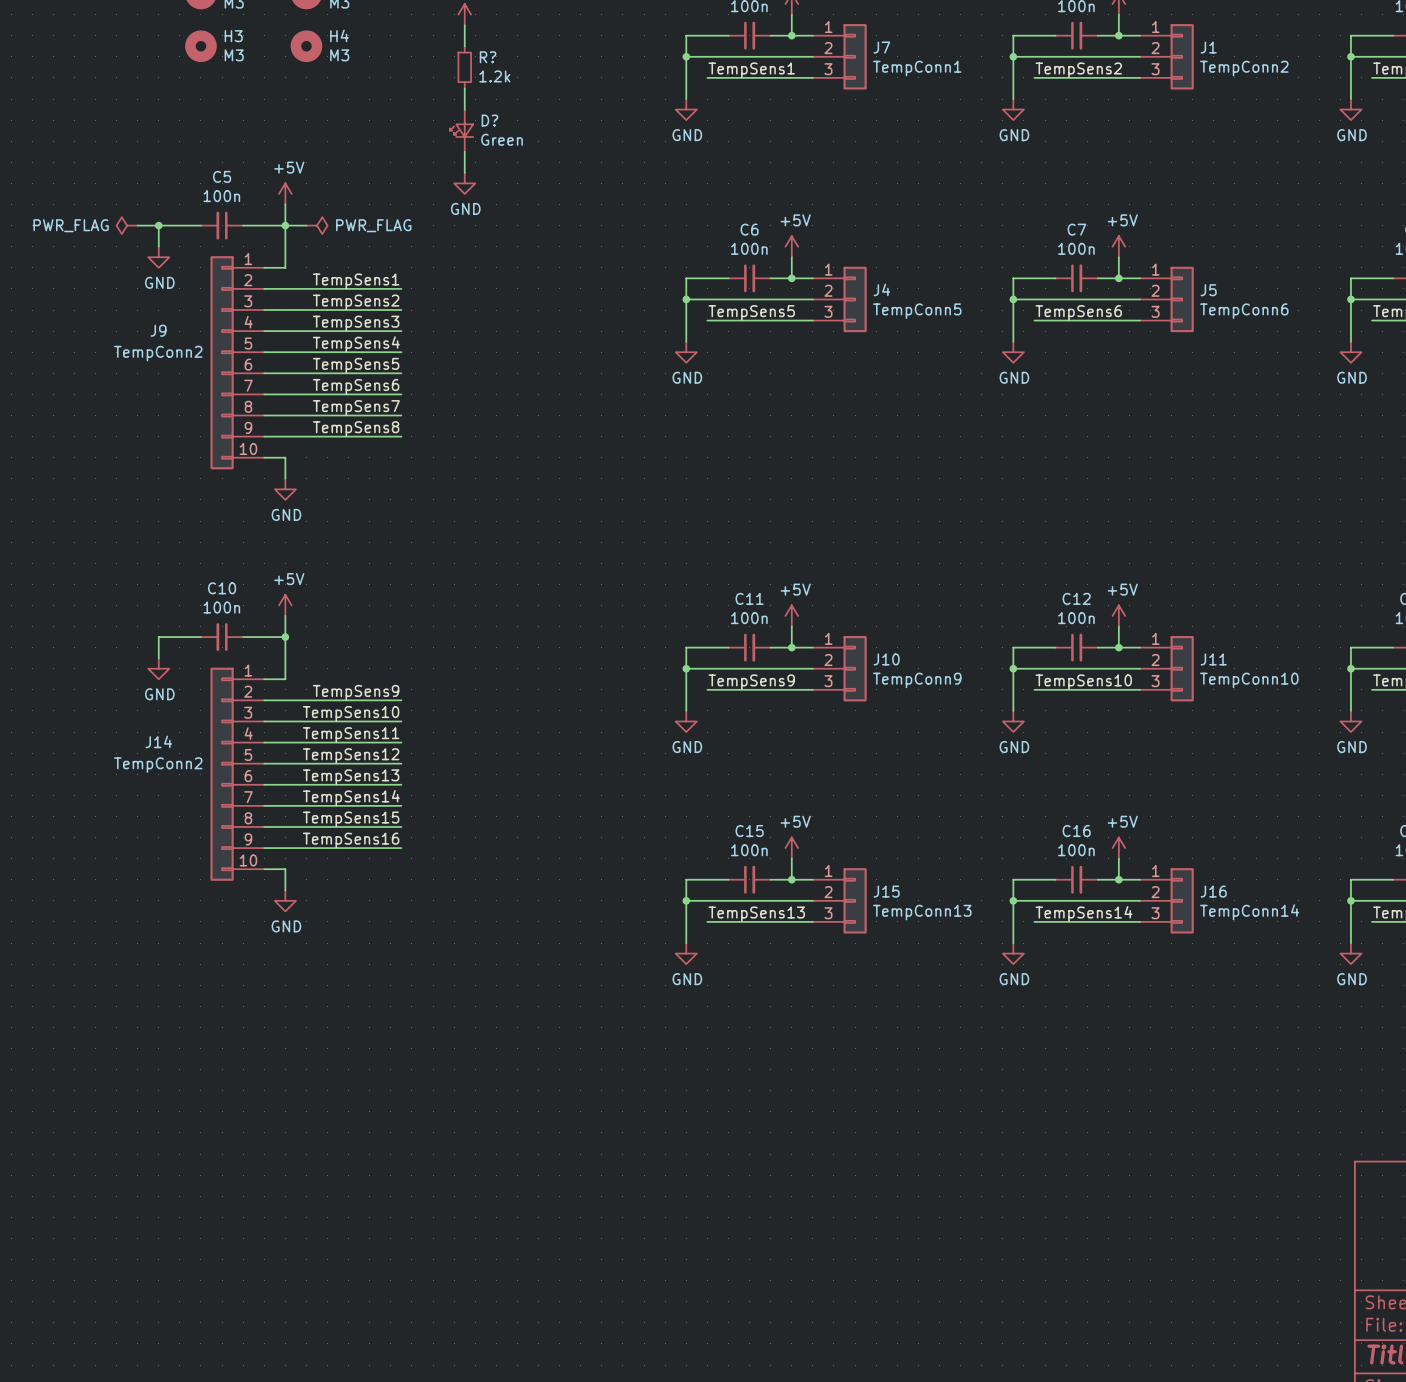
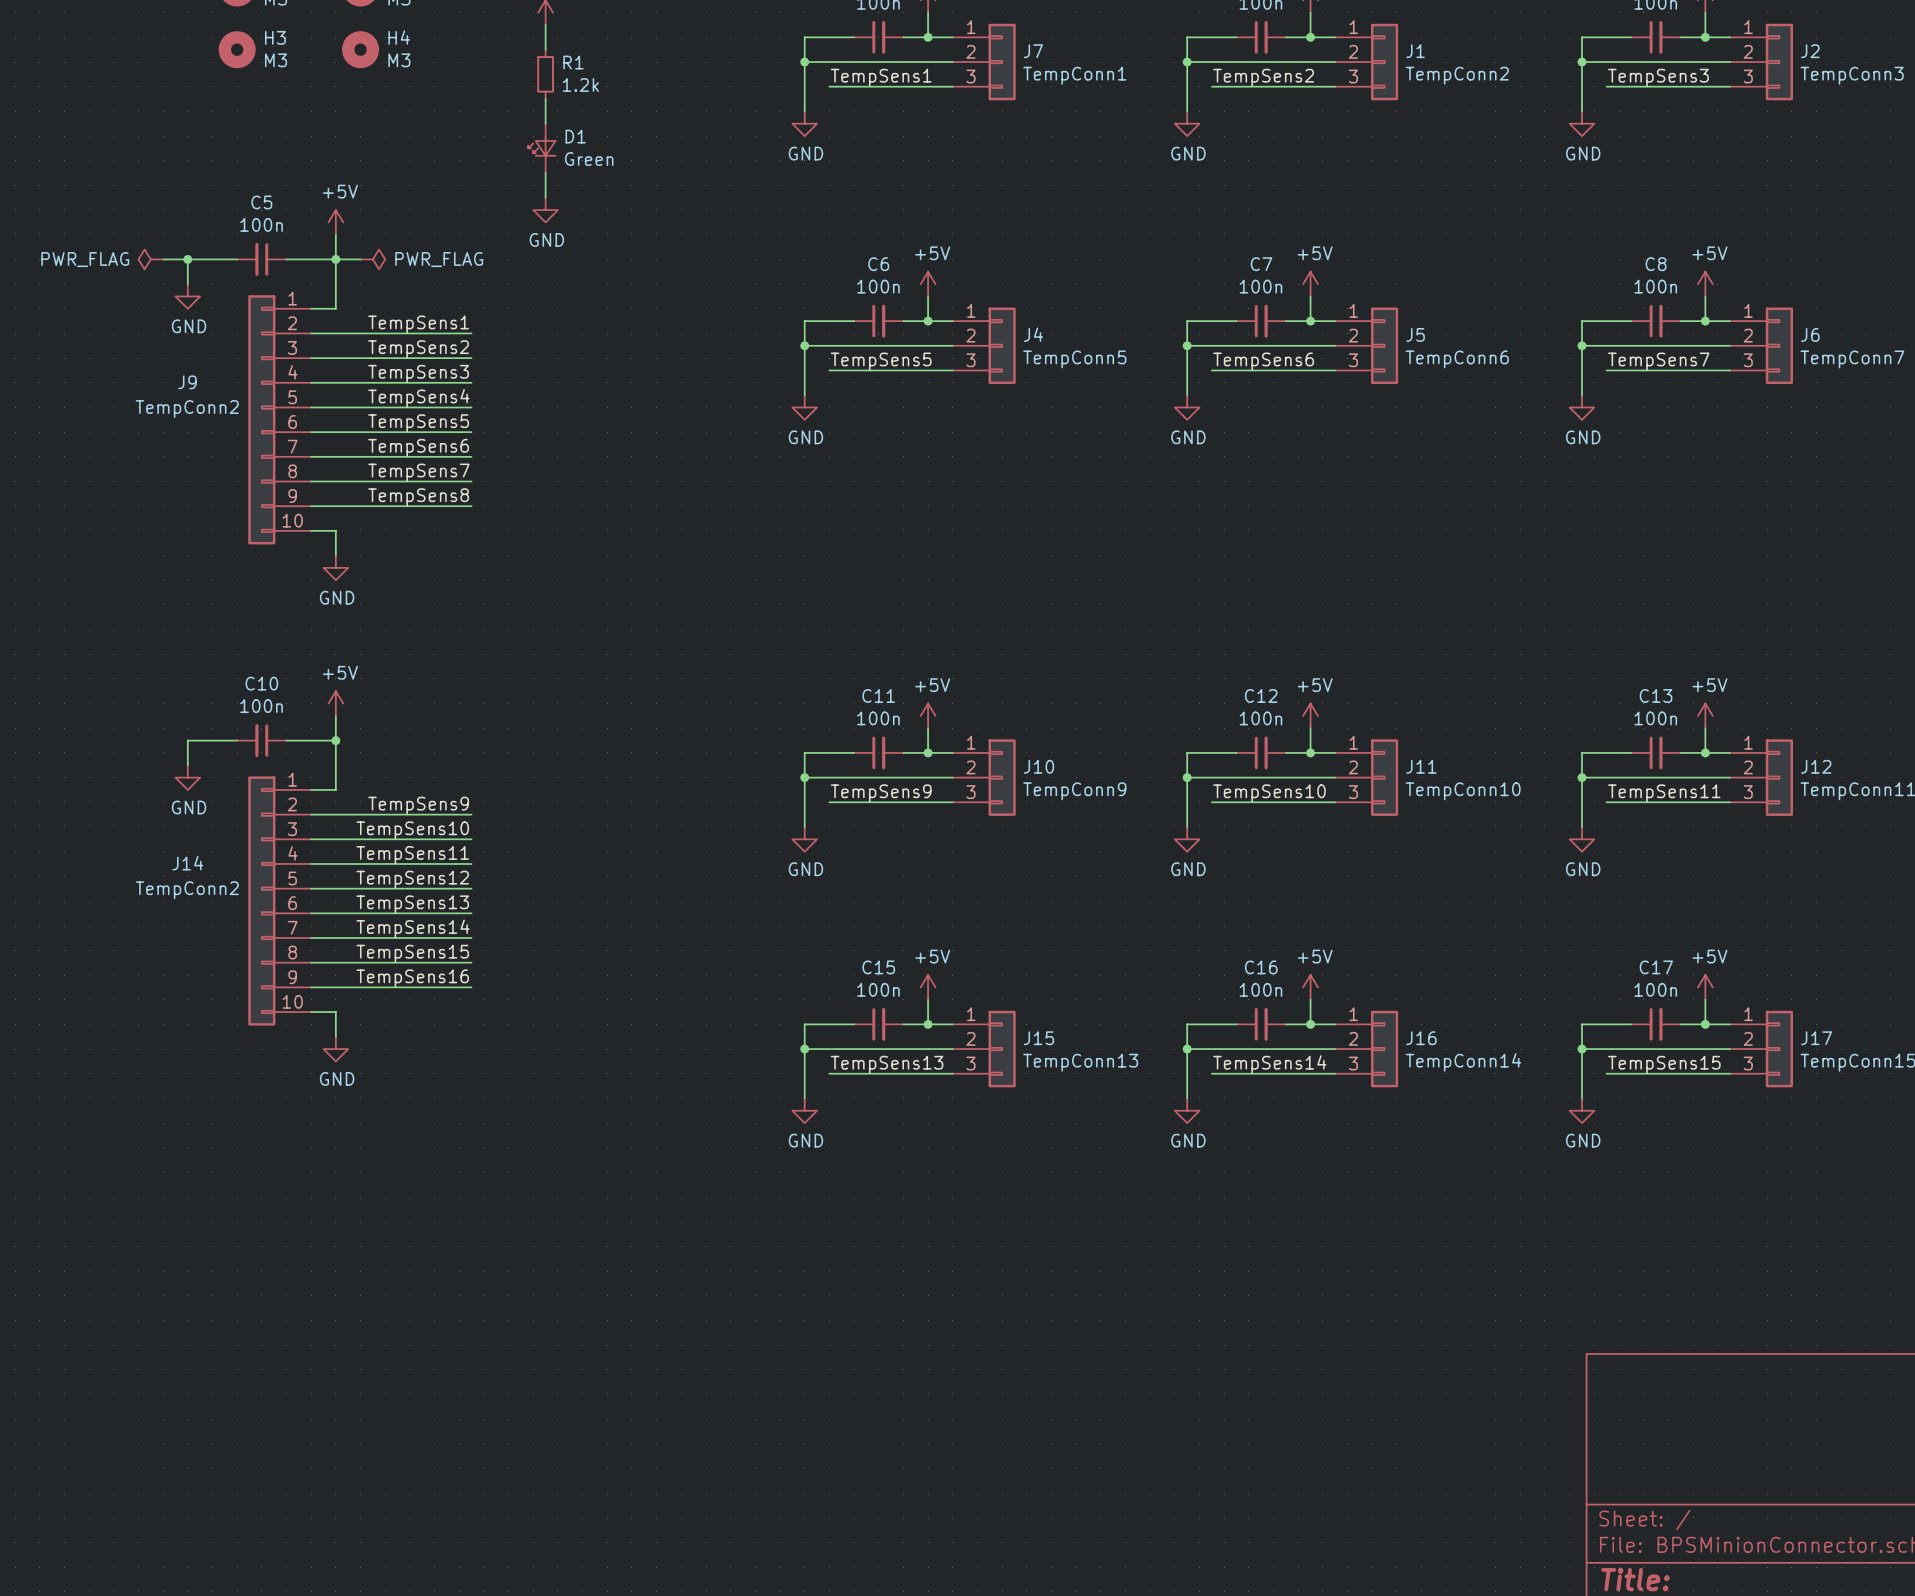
R? name: R? (488, 57) -> R1 (573, 62)
D? name: D? (489, 120) -> D1 (575, 136)

